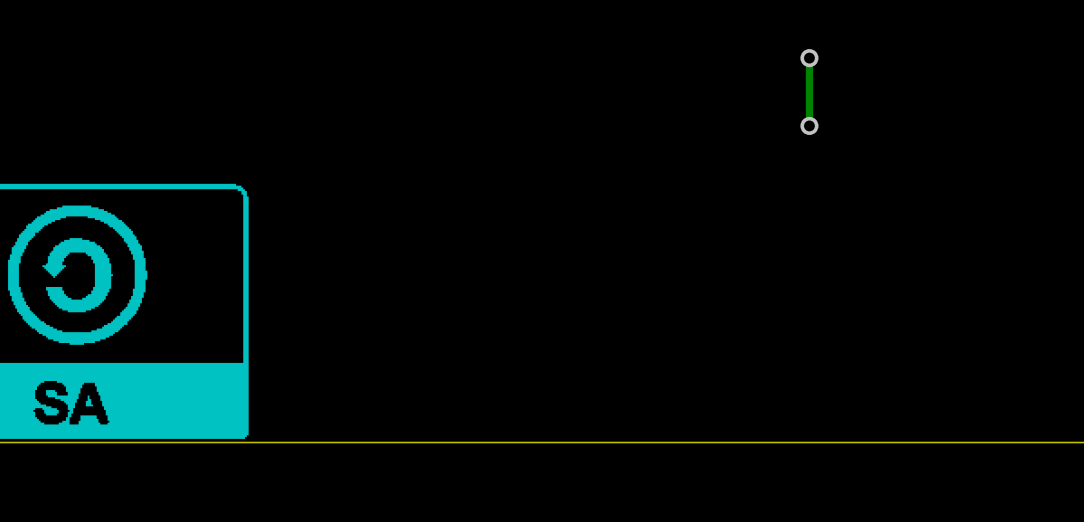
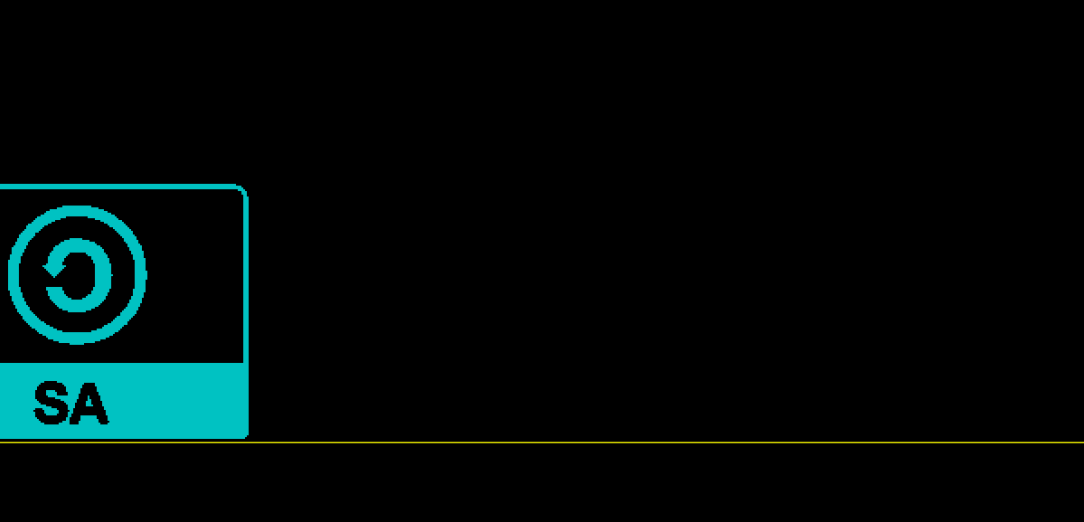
track: (809, 58) (809, 125) -> none
via: (809, 58) -> none
via: (809, 125) -> none

